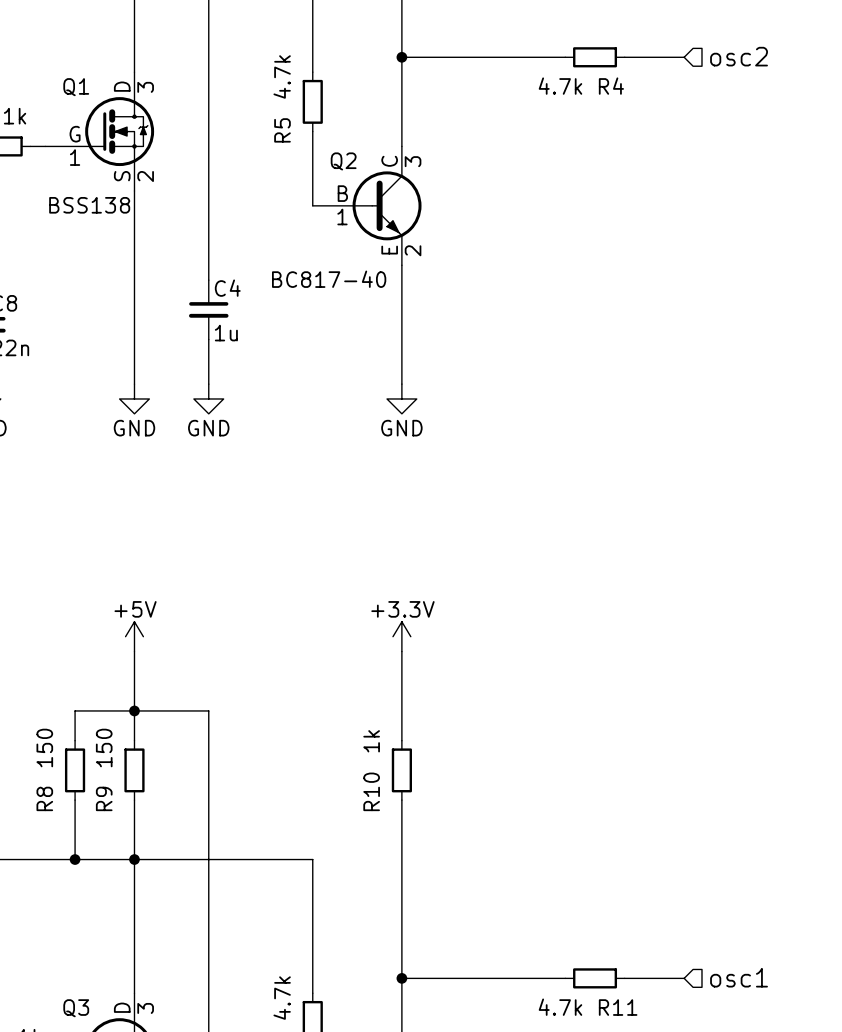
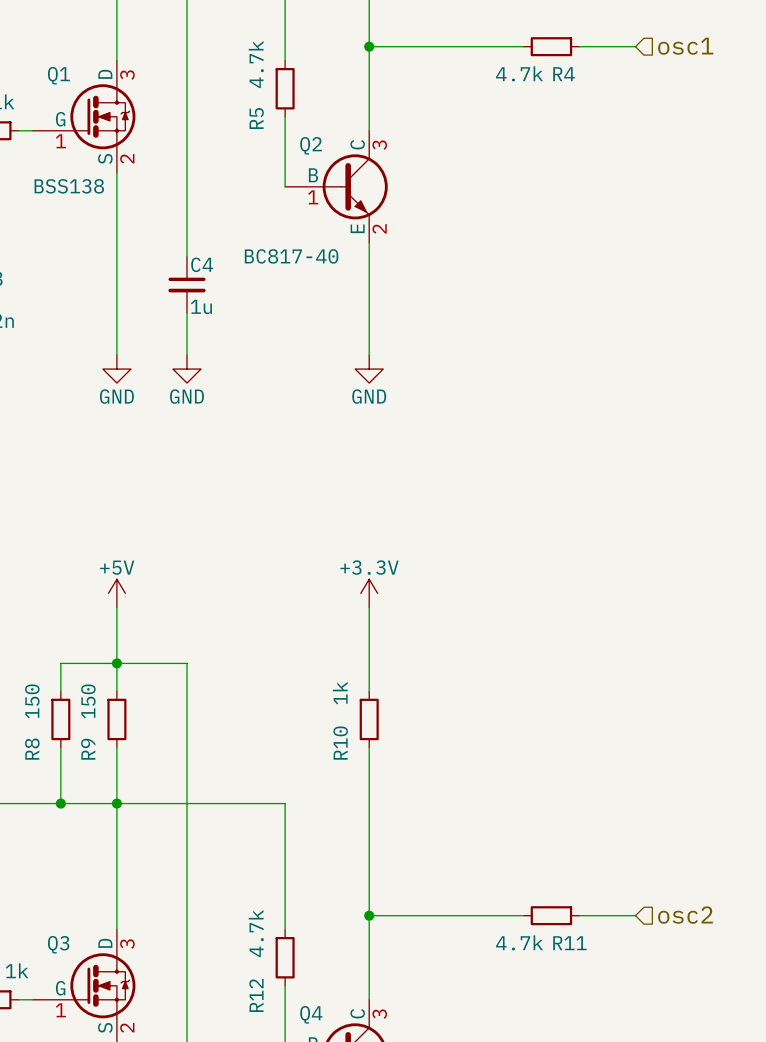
hierarchical label: osc2 (739, 56) -> osc1 (685, 46)
hierarchical label: osc1 (739, 977) -> osc2 (685, 915)

